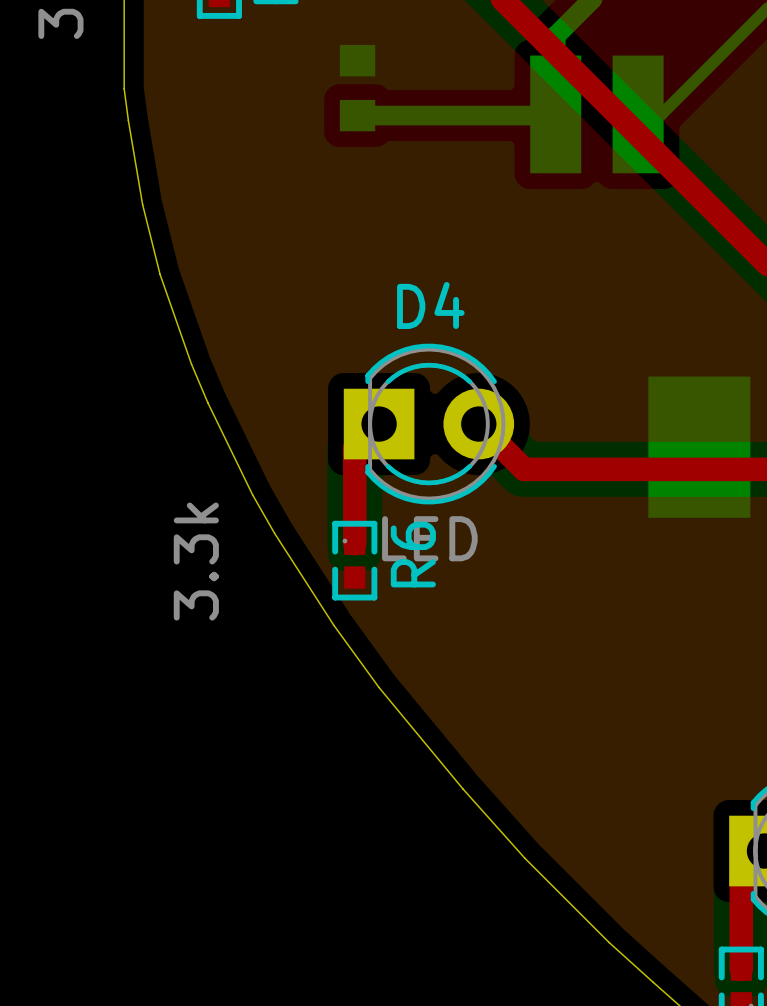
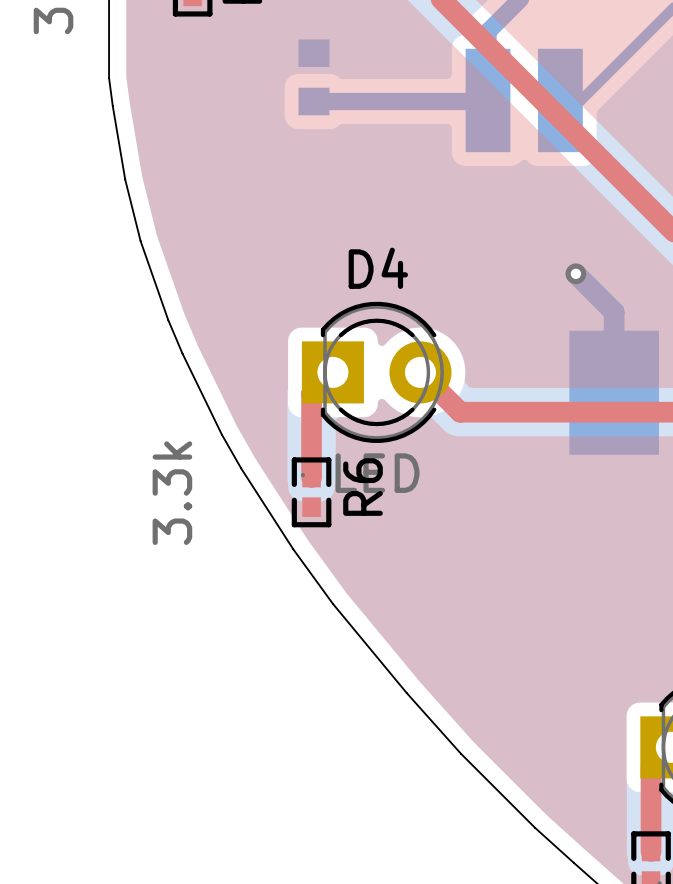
bottom track: none -> (575, 273) (614, 312) (614, 392)
via: none -> (575, 273)

